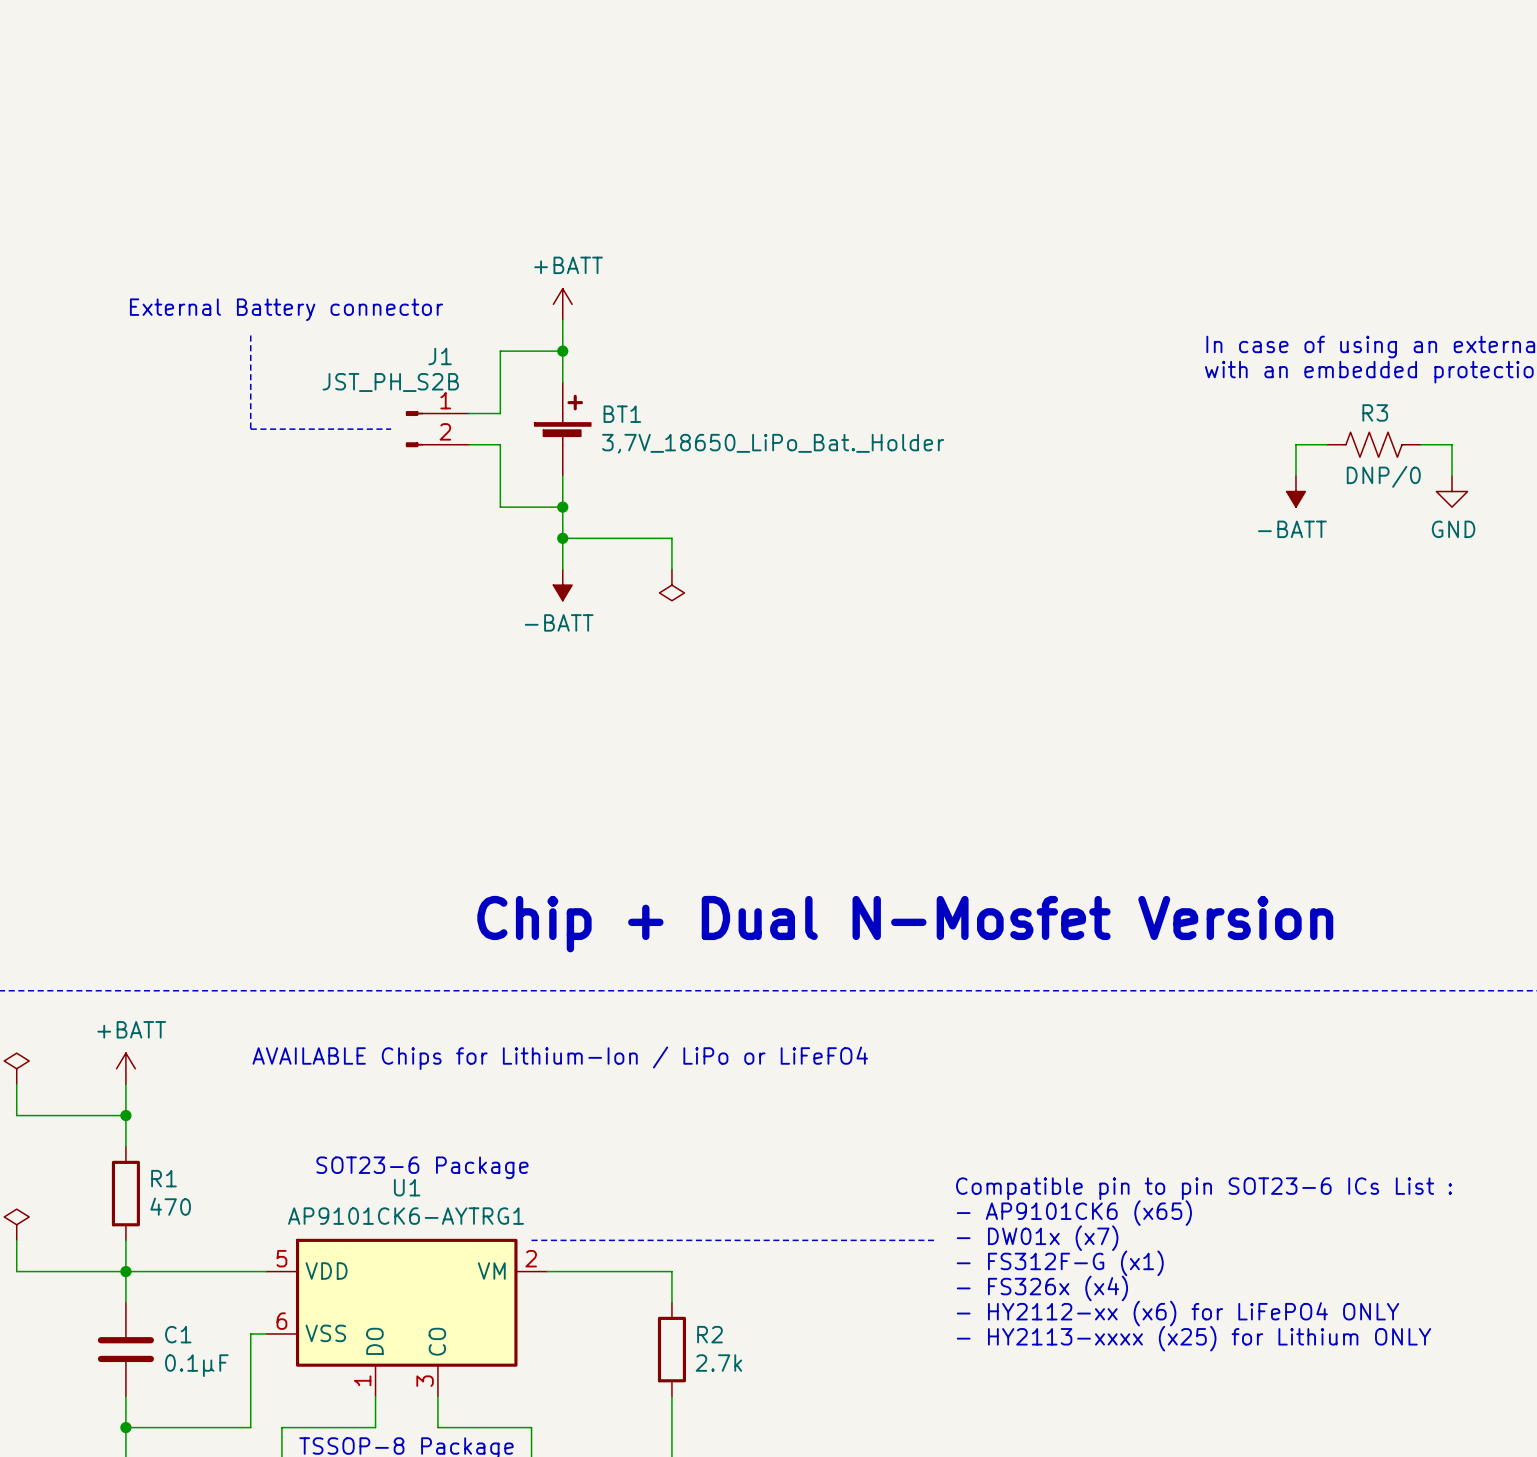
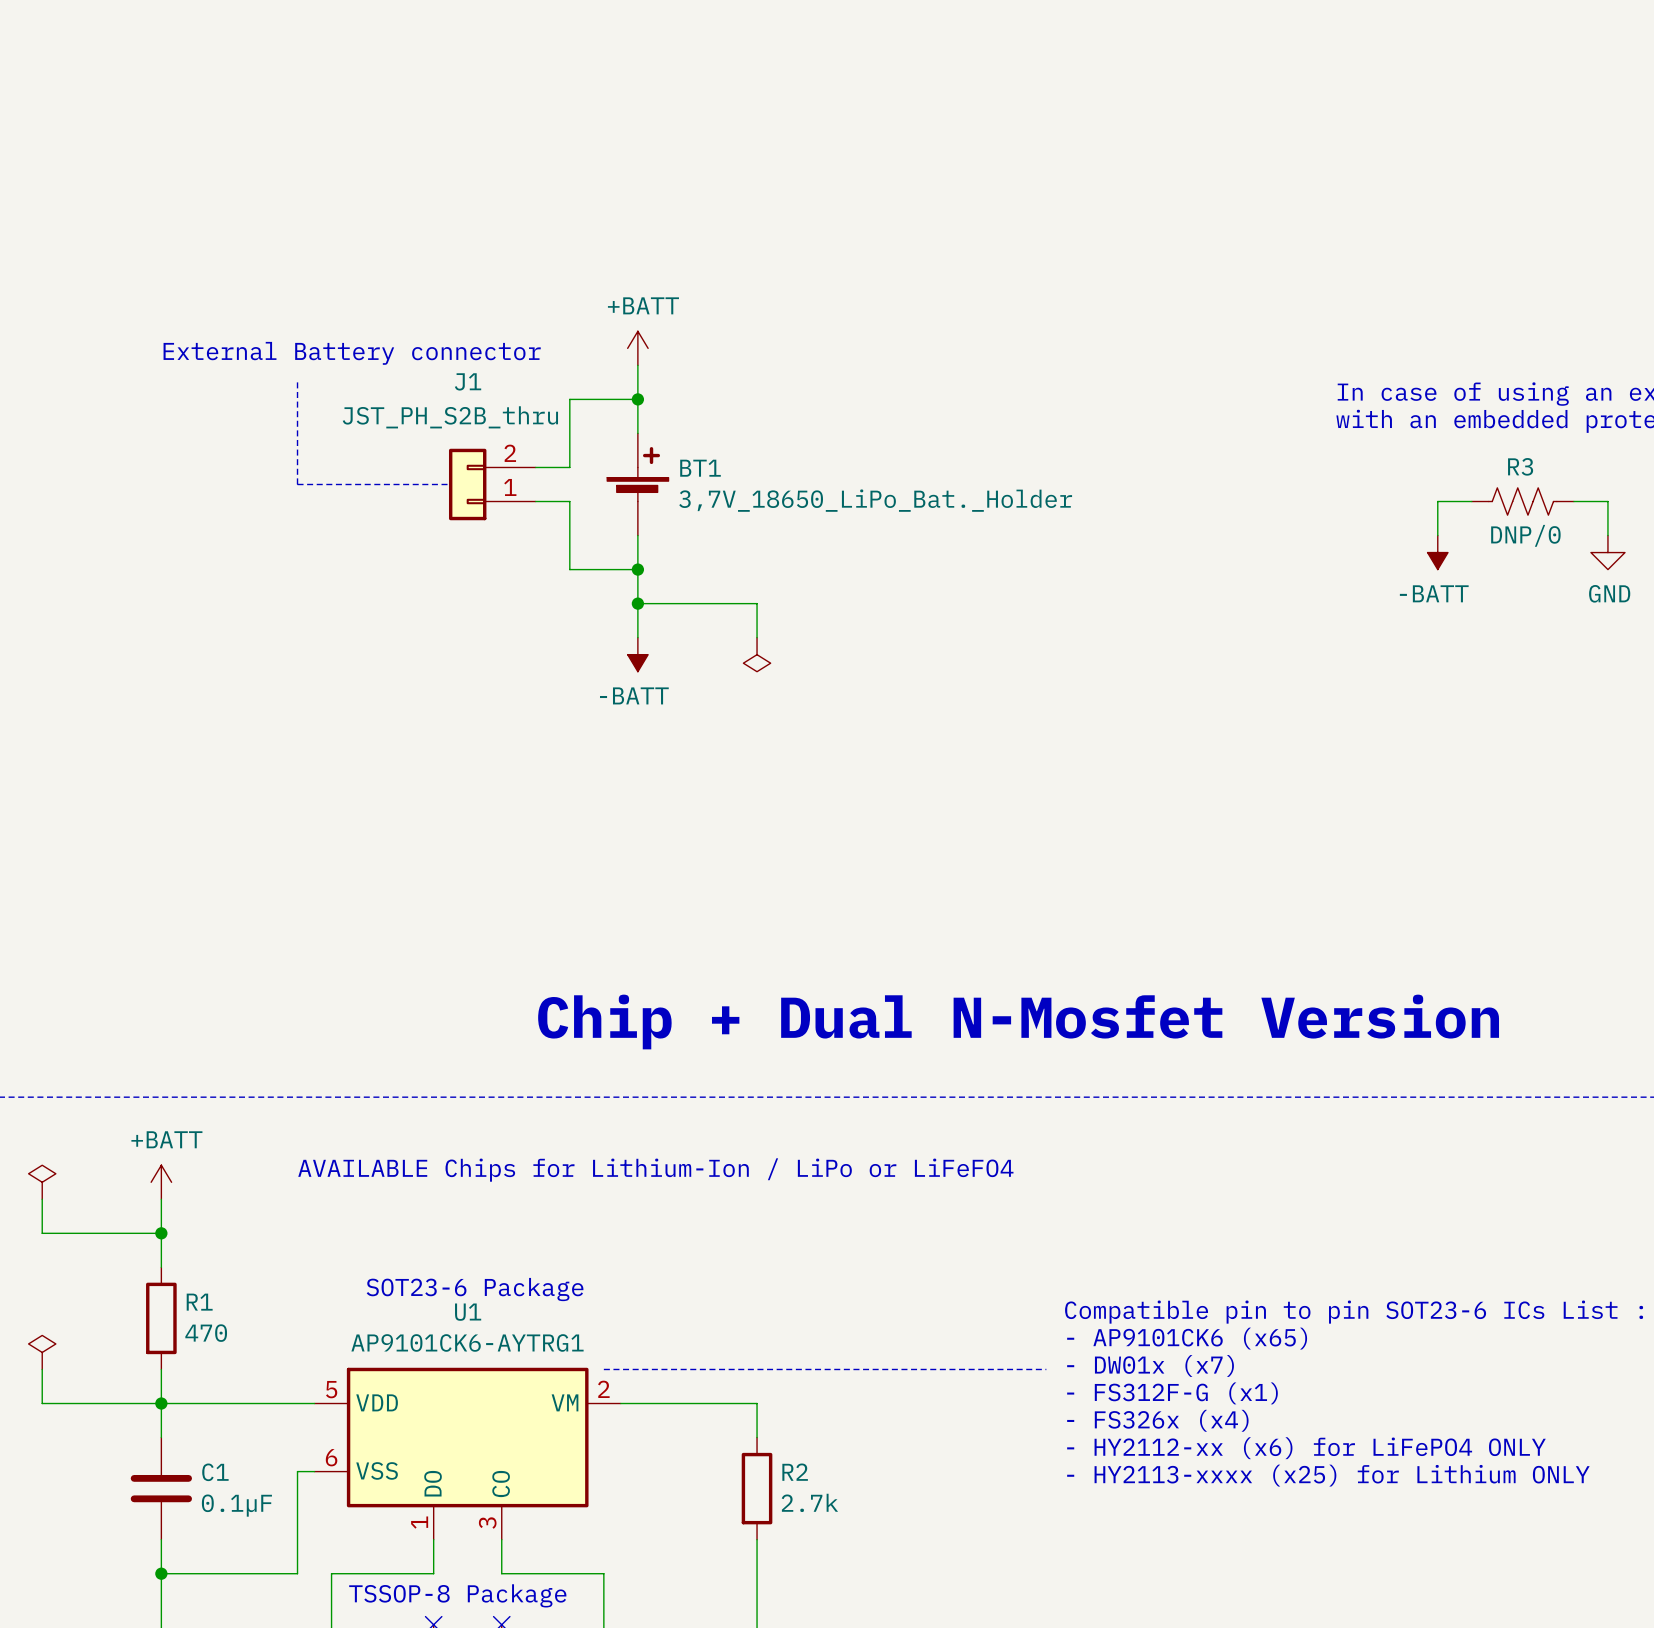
J1 name position: J1 (440, 356) -> J1 (468, 381)
J1 value: JST_PH_S2B (390, 382) -> JST_PH_S2B_thru (450, 417)
J1 symbol: [405, 411, 470, 448] -> [448, 448, 536, 521]

